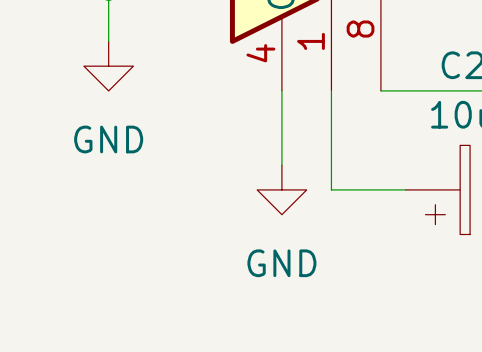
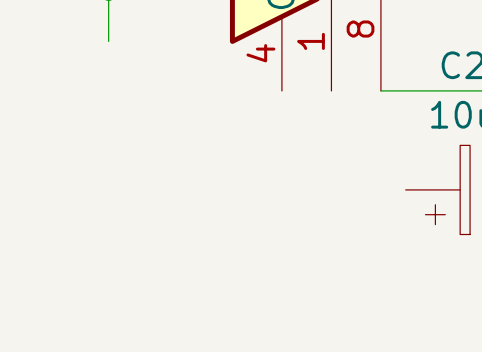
power symbol: GND (108, 66) -> none
wire: (281, 90) (281, 165) -> none
wire: (331, 90) (331, 189) (405, 189) -> none
power symbol: GND (281, 189) -> none

